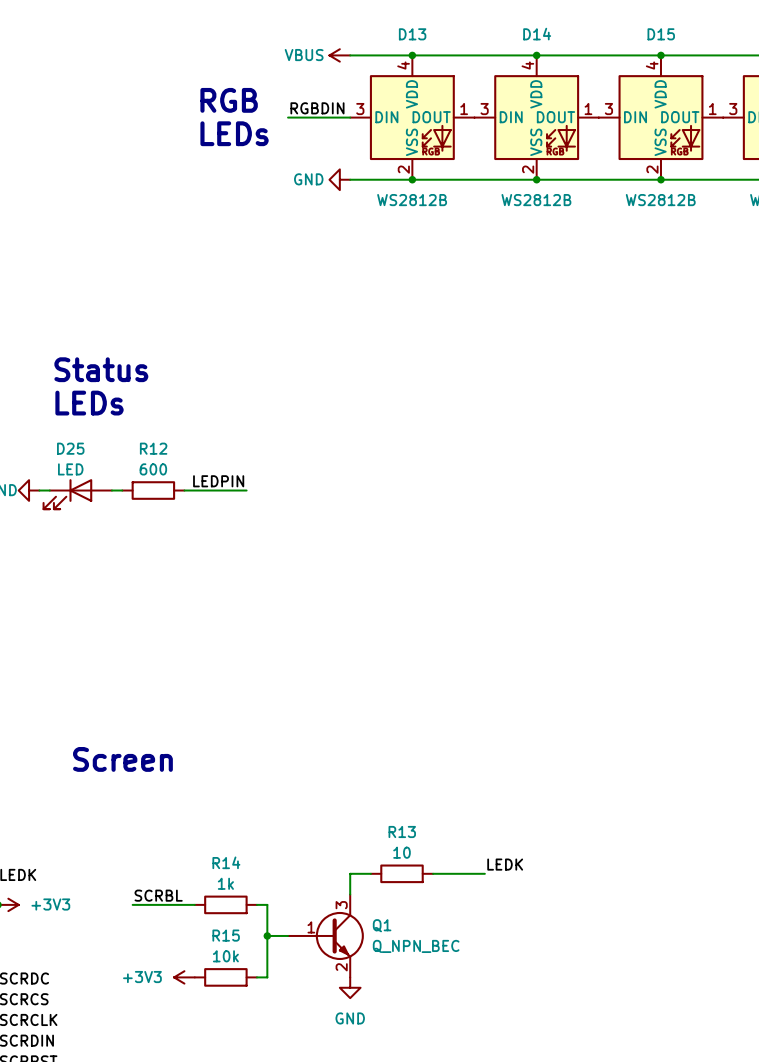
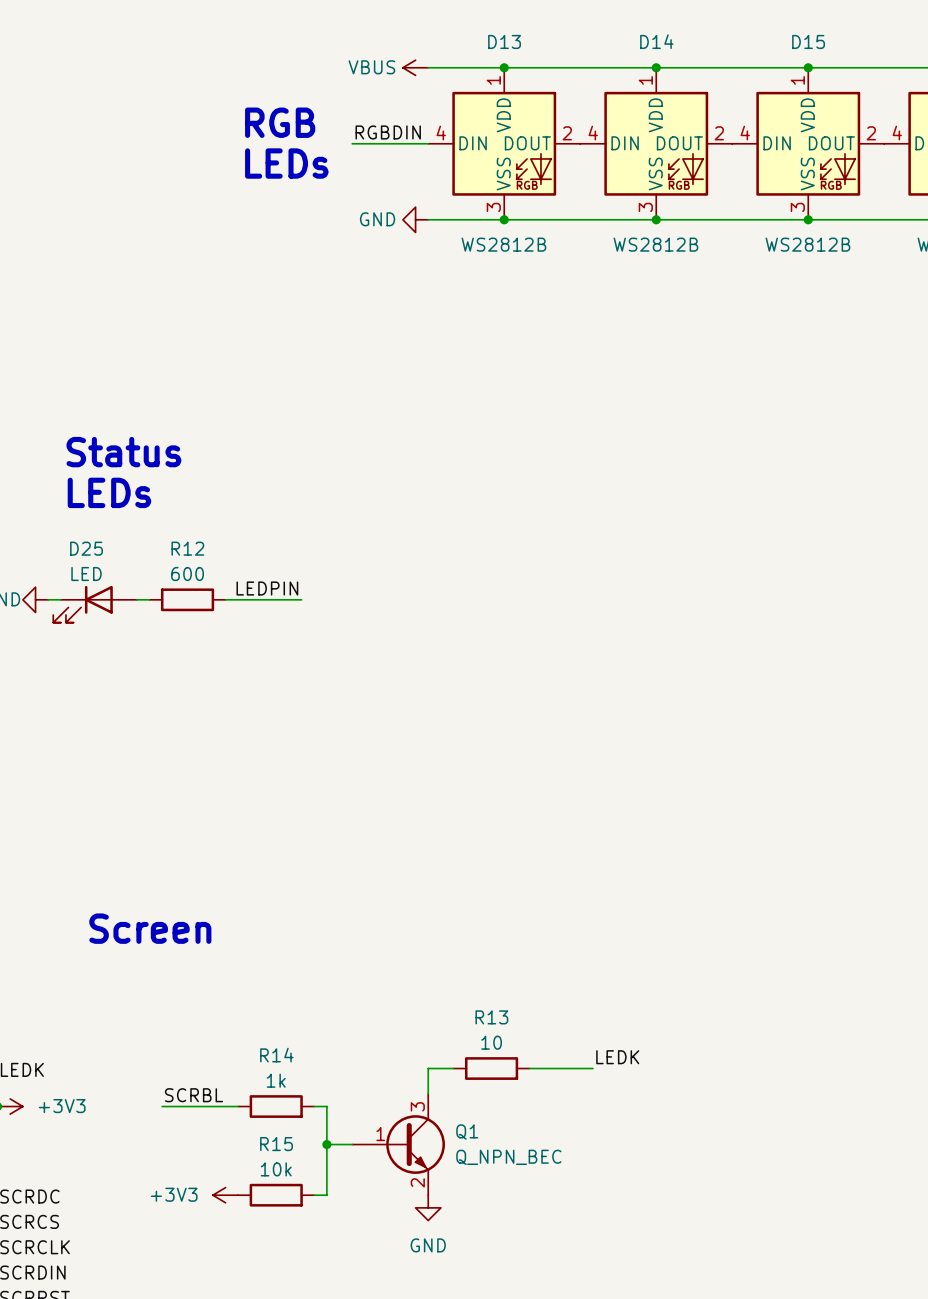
D13 pin number: 4 (403, 65) -> 1 (493, 80)
D14 pin number: 4 (527, 65) -> 1 (645, 80)
D15 pin number: 4 (652, 65) -> 1 (797, 80)
D13 pin number: 3 (360, 109) -> 4 (441, 133)
D13 pin number: 1 (464, 109) -> 2 (567, 133)
D14 pin number: 3 (484, 109) -> 4 (593, 133)
D14 pin number: 1 (588, 109) -> 2 (719, 133)
D15 pin number: 3 (608, 109) -> 4 (745, 133)
D15 pin number: 1 (712, 109) -> 2 (871, 133)
part pin number: 3 (733, 109) -> 4 (897, 133)
D13 pin number: 2 (403, 169) -> 3 (493, 207)
D14 pin number: 2 (528, 169) -> 3 (645, 207)
D15 pin number: 2 (652, 169) -> 3 (797, 207)

